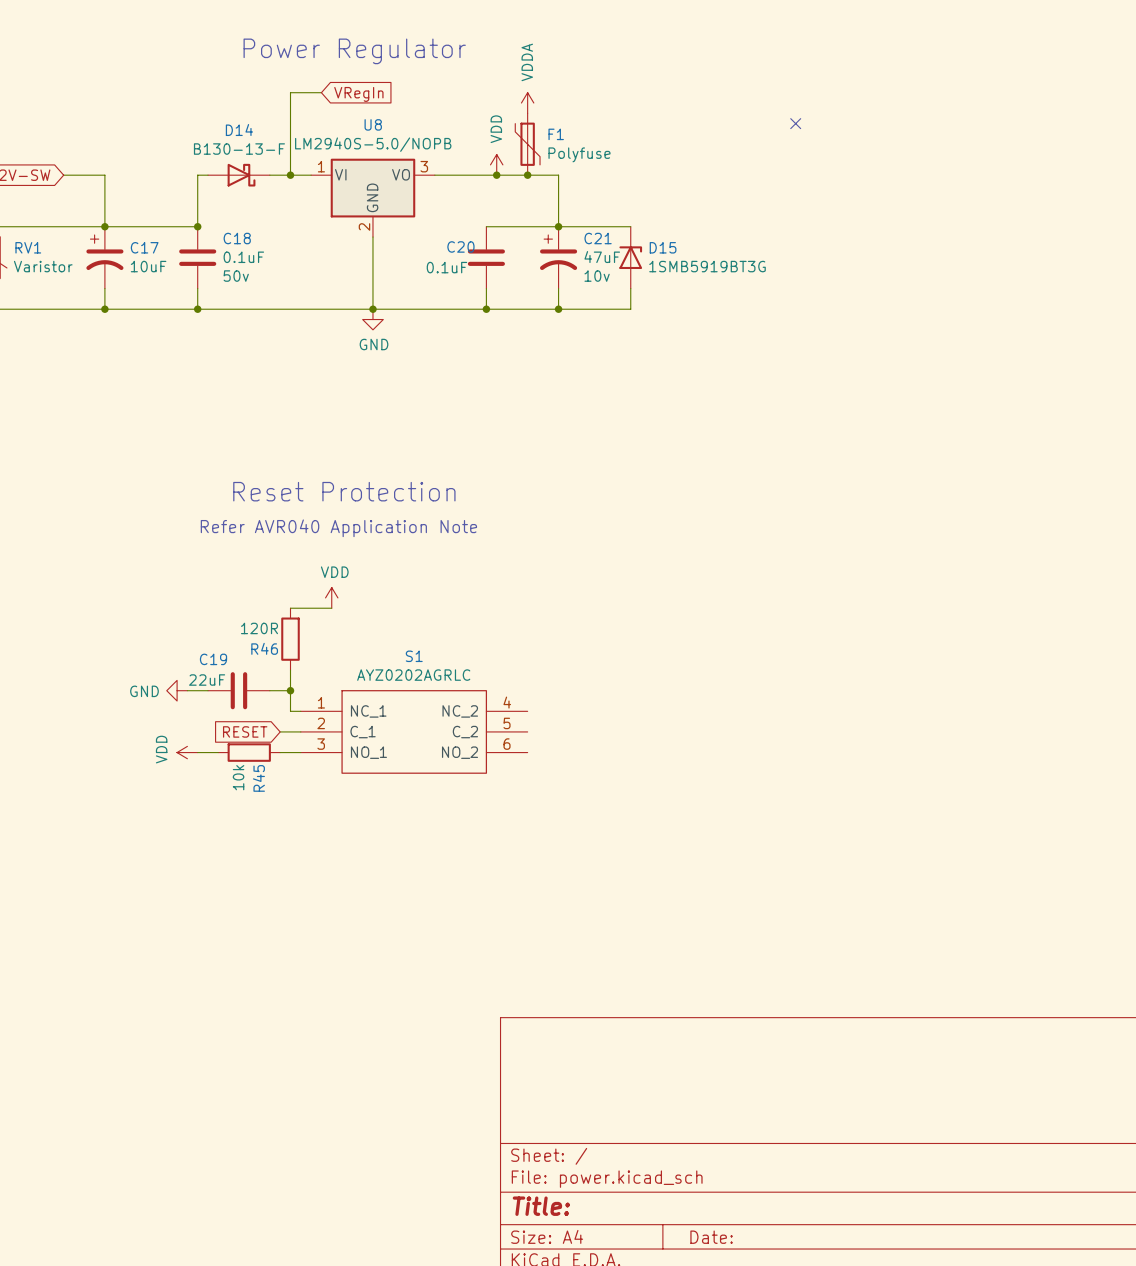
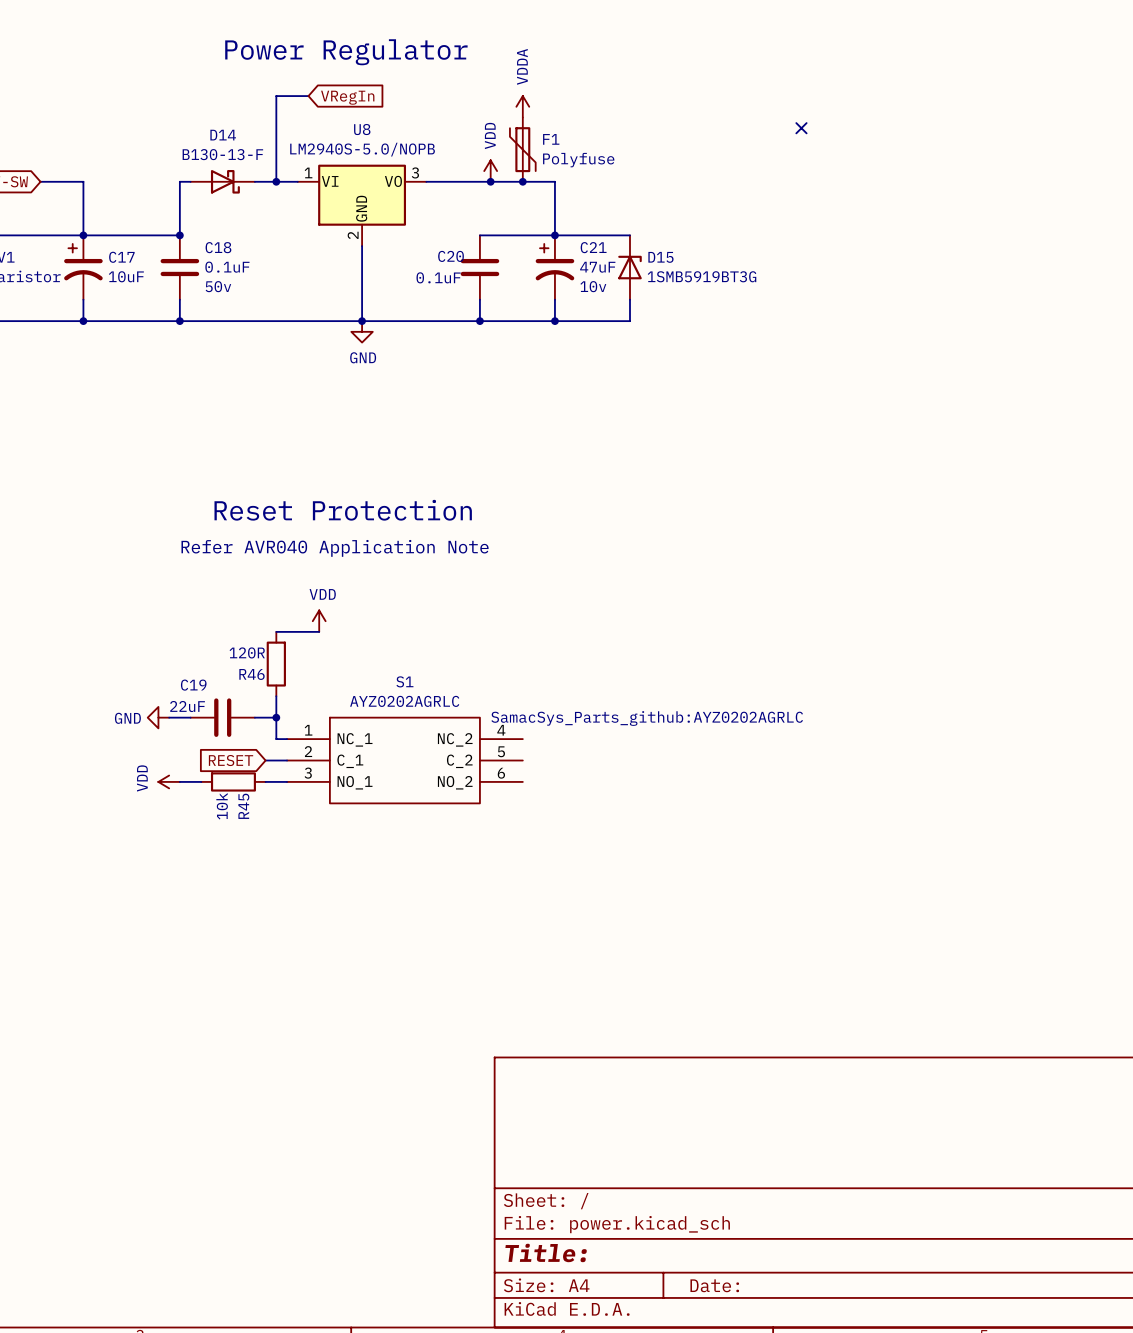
S1 text: none -> SamacSys_Parts_github:AYZ0202AGRLC (647, 718)

